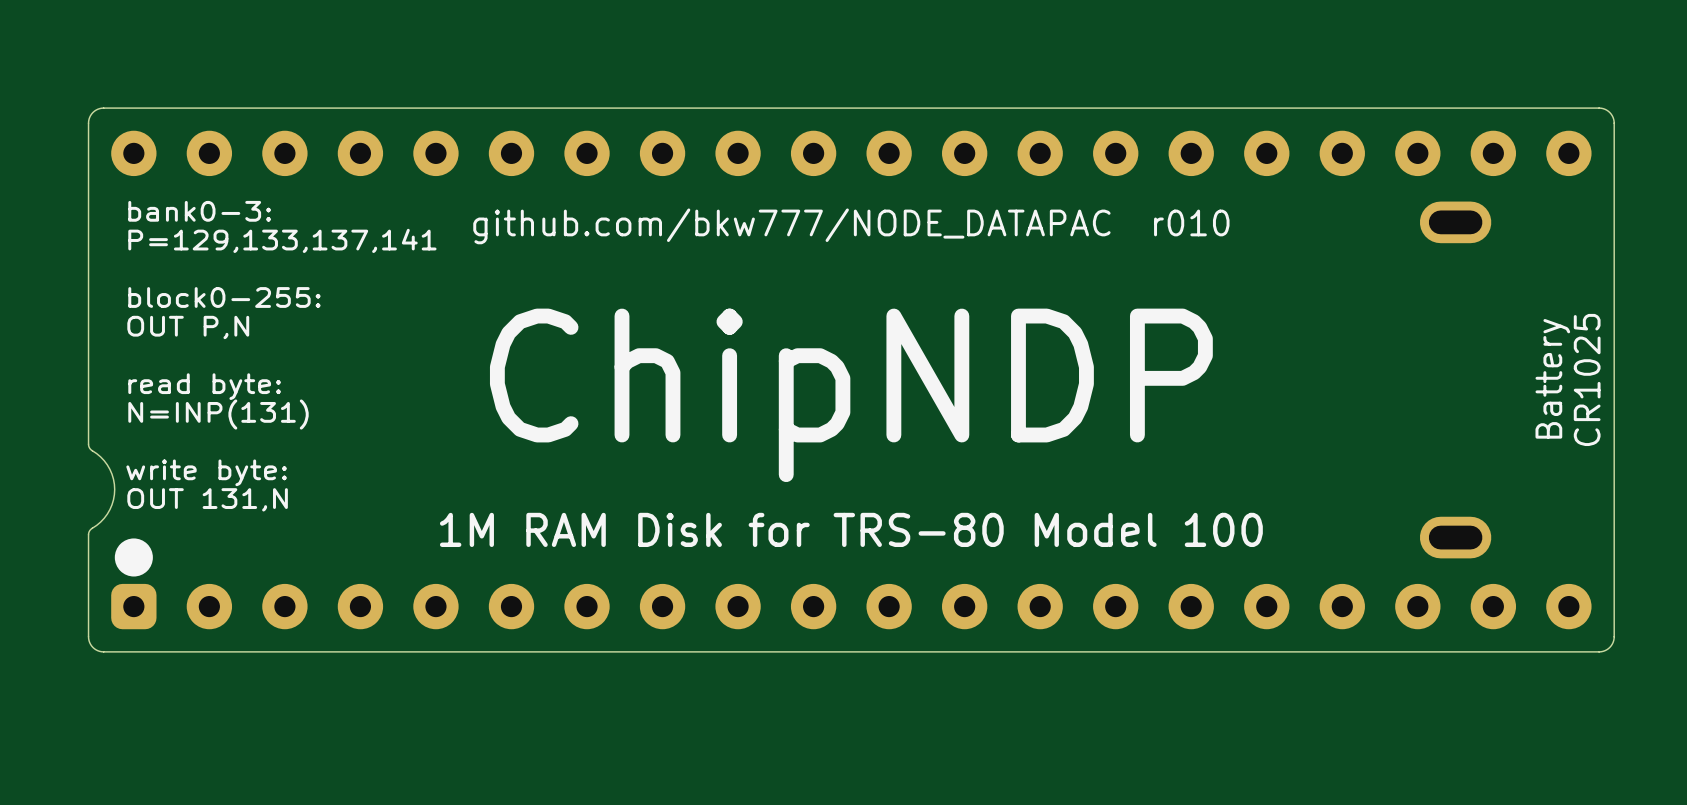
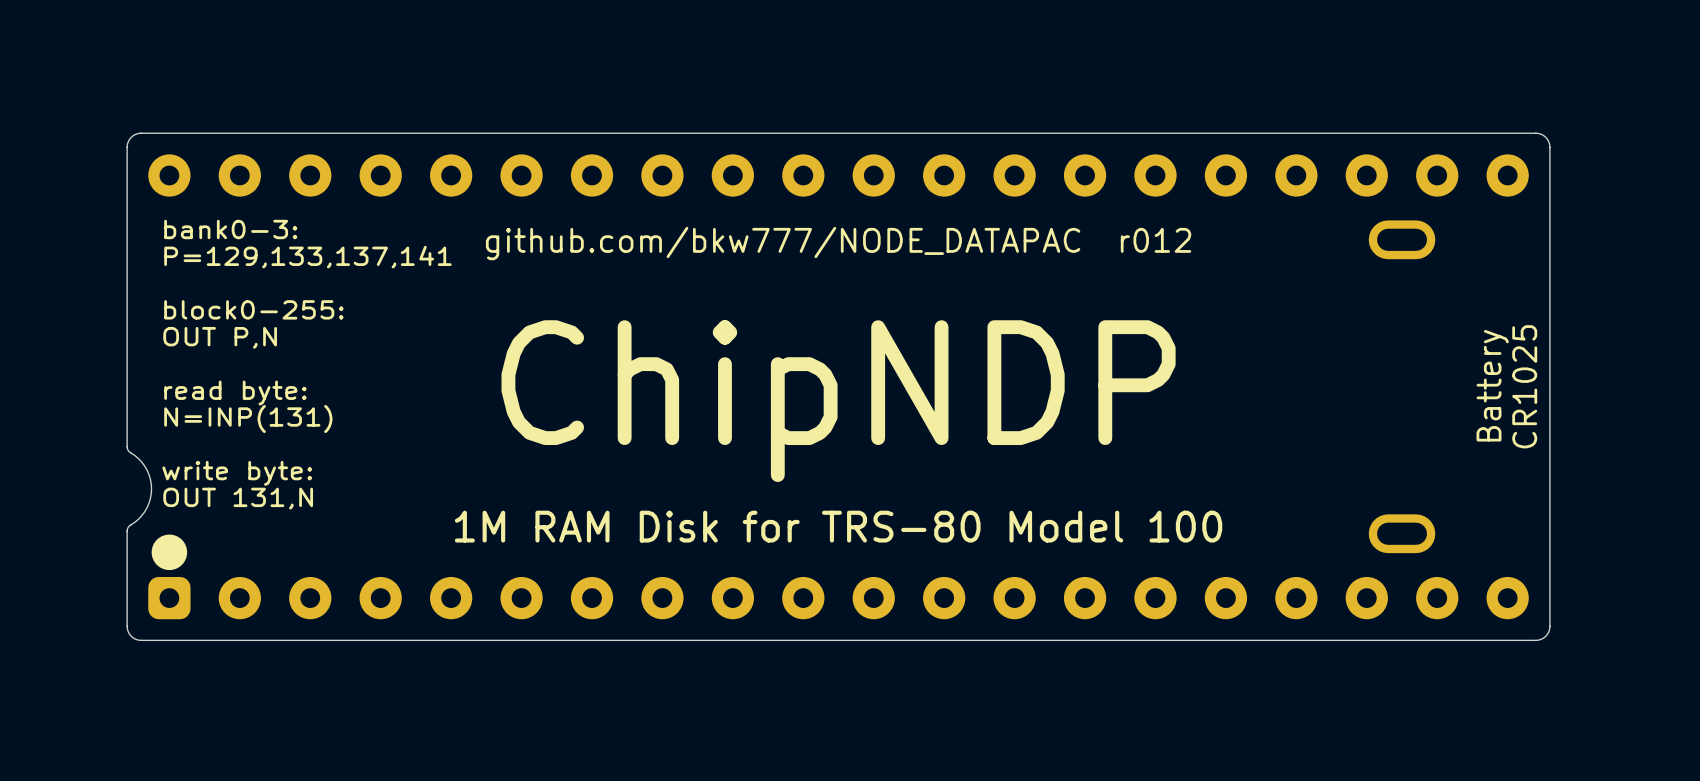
text: github.com/bkw777/NODE_DATAPAC r010 (851, 226) -> github.com/bkw777/NODE_DATAPAC r012 (838, 243)

